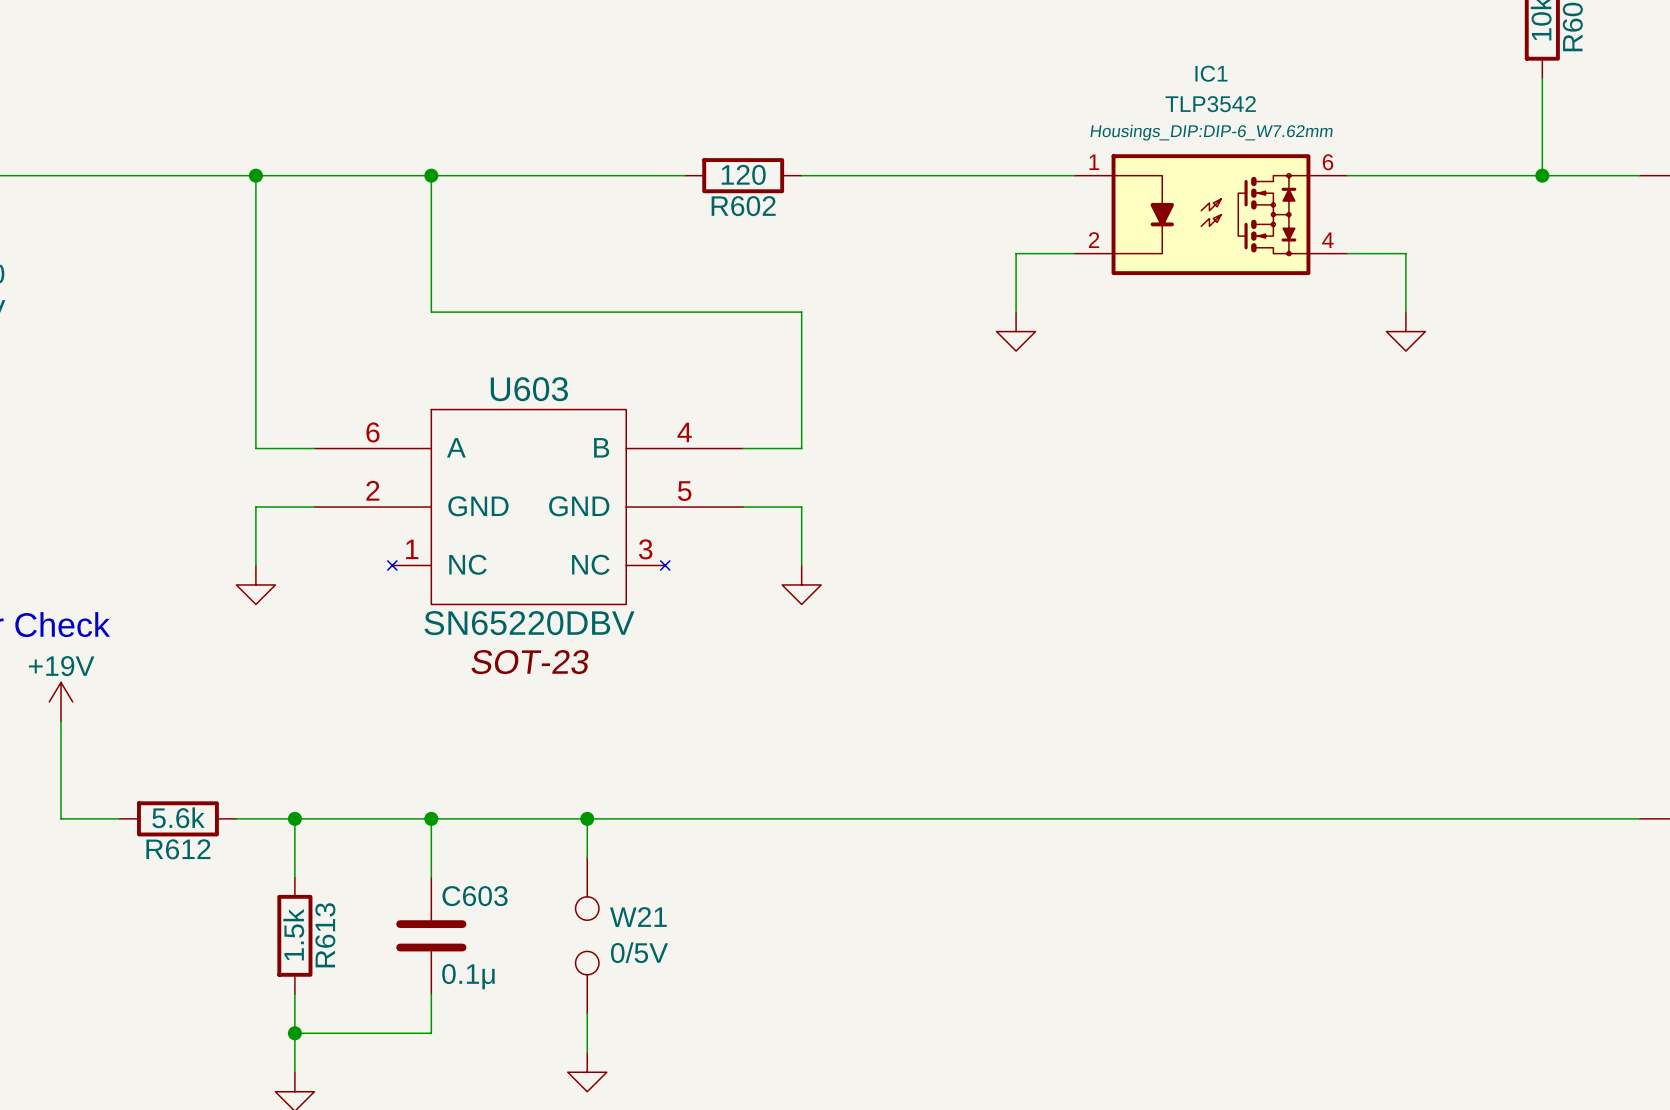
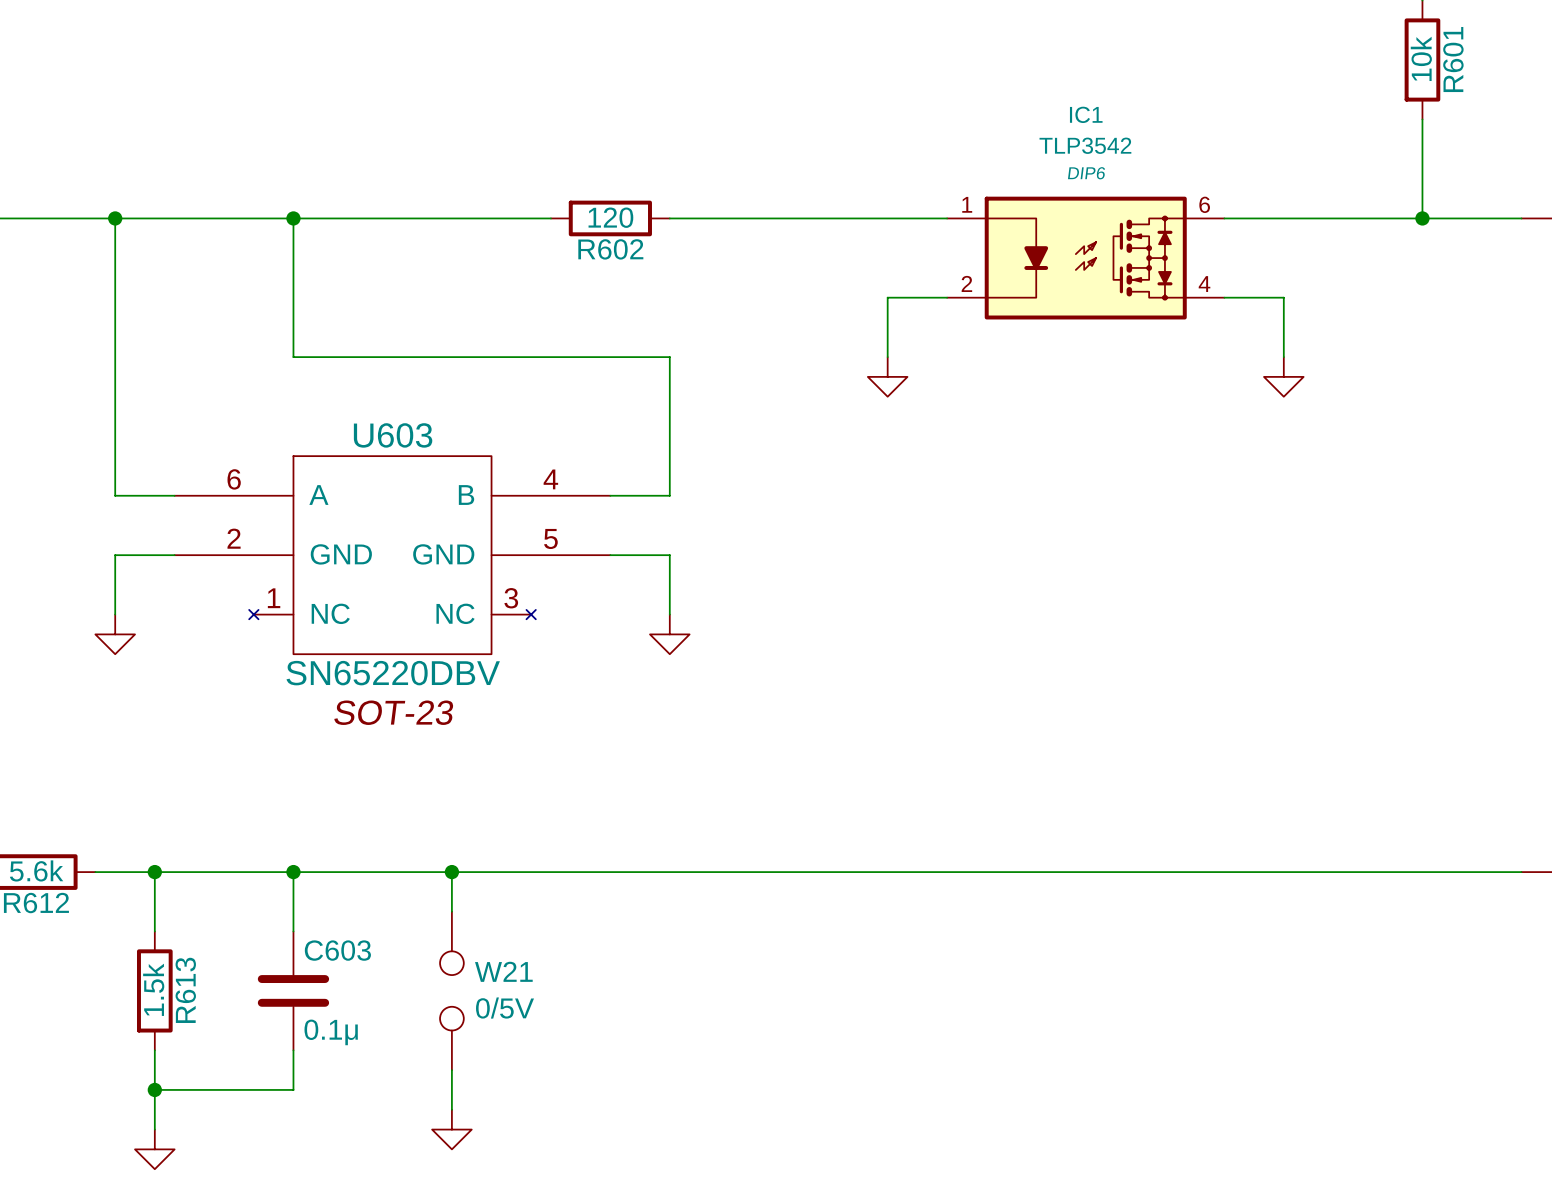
IC1 text: Housings_DIP:DIP-6_W7.62mm (1211, 132) -> DIP6 (1086, 173)

